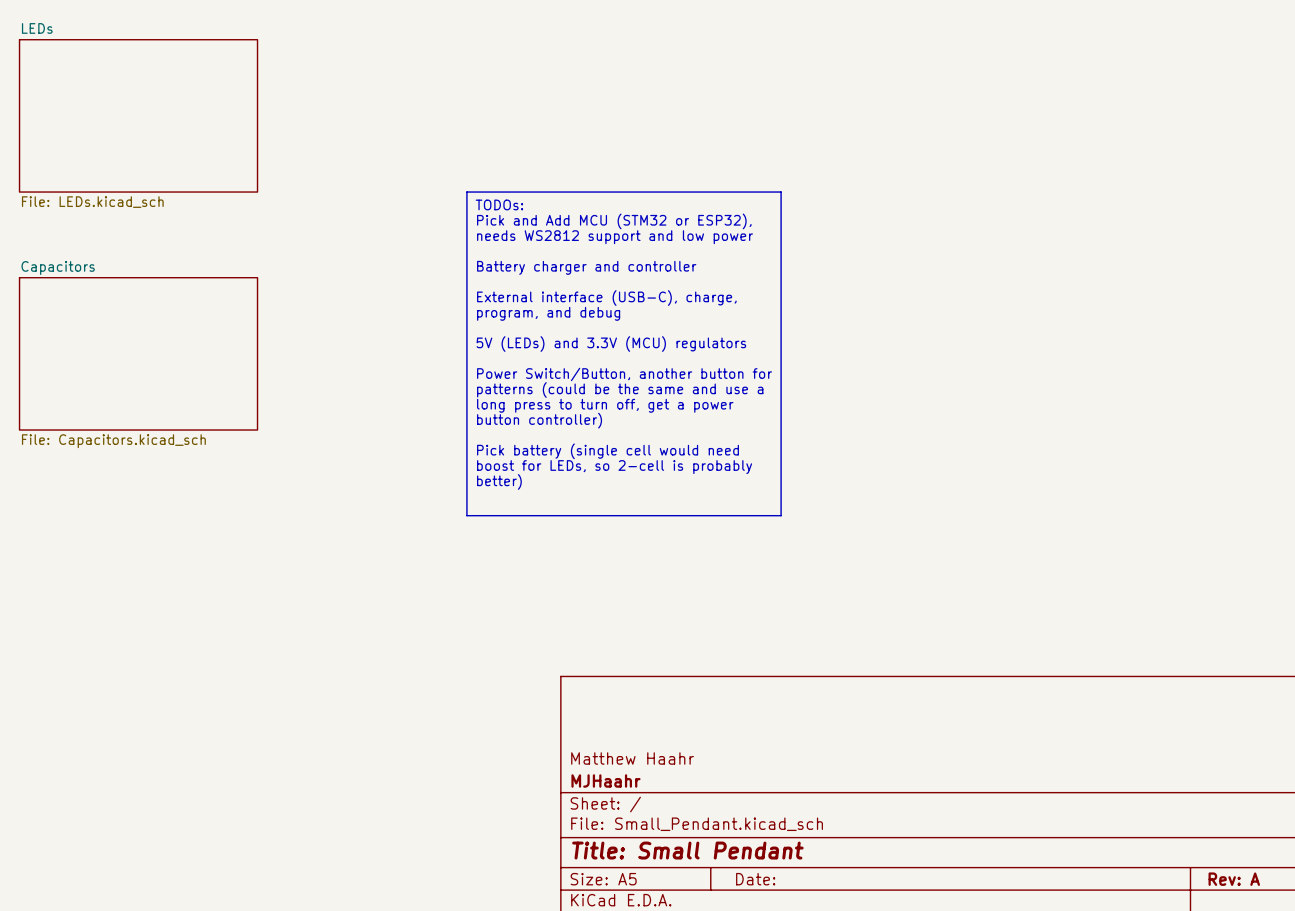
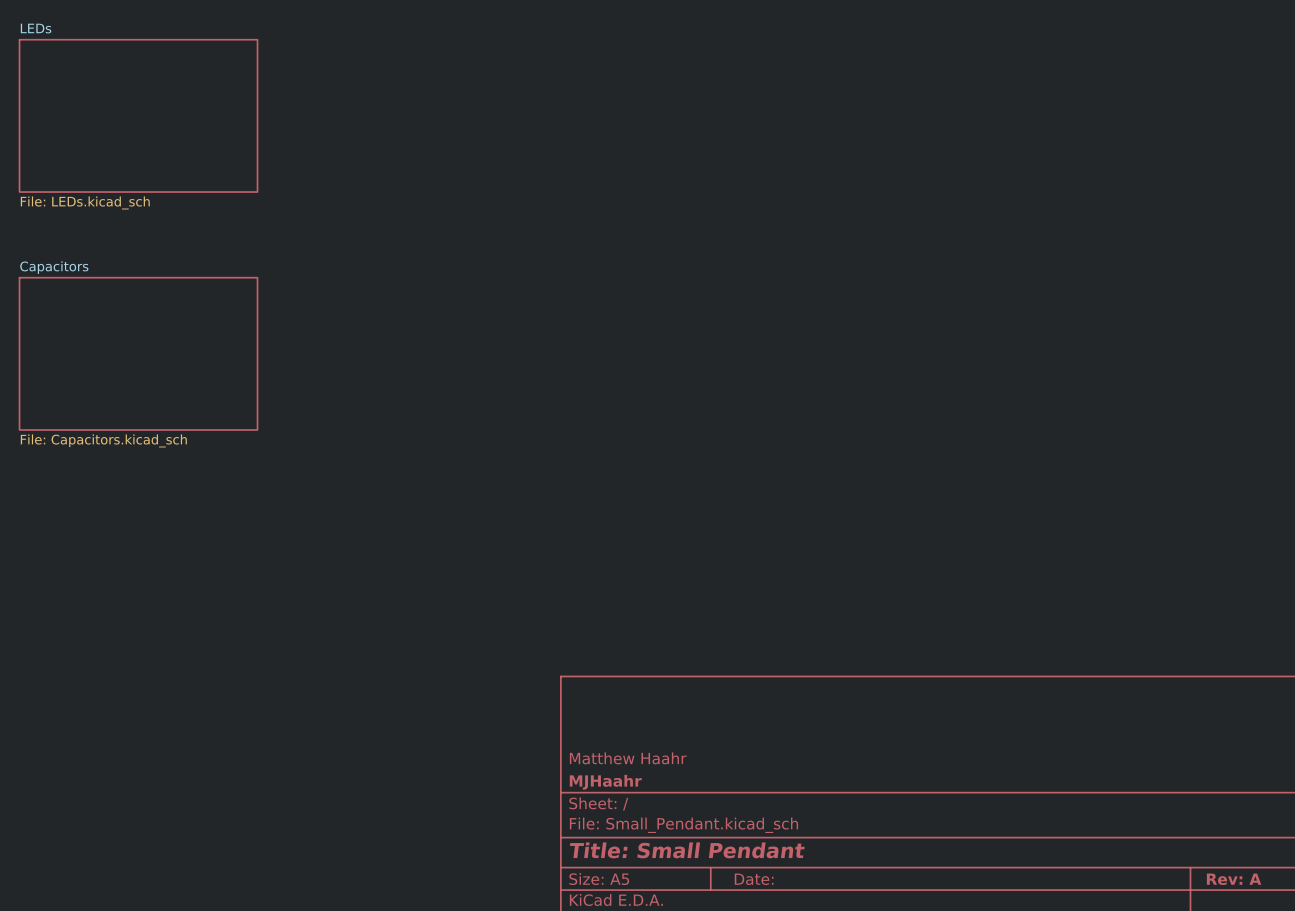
line: (466, 192) (781, 192) (781, 515) (466, 515) (466, 192) -> none
text: TODOs: (499, 204) -> none
text: Pick and Add MCU (STM32 or ESP32), (614, 221) -> none
text: needs WS2812 support and low power (615, 237) -> none
text: Battery charger and controller (586, 267) -> none
text: External interface (USB-C), charge, (606, 298) -> none
text: program, and debug (548, 313) -> none
text: 5V (LEDs) and 3.3V (MCU) regulators (611, 344) -> none
text: Power Switch/Button, another button for (624, 374) -> none
text: patterns (could be the same and use a (620, 389) -> none
text: long press to turn off, get a power (605, 405) -> none
text: button controller) (539, 420) -> none
text: Pick battery (single cell would need (607, 451) -> none
text: boost for LEDs, so 2-cell is probably (614, 467) -> none
text: better) (499, 481) -> none

